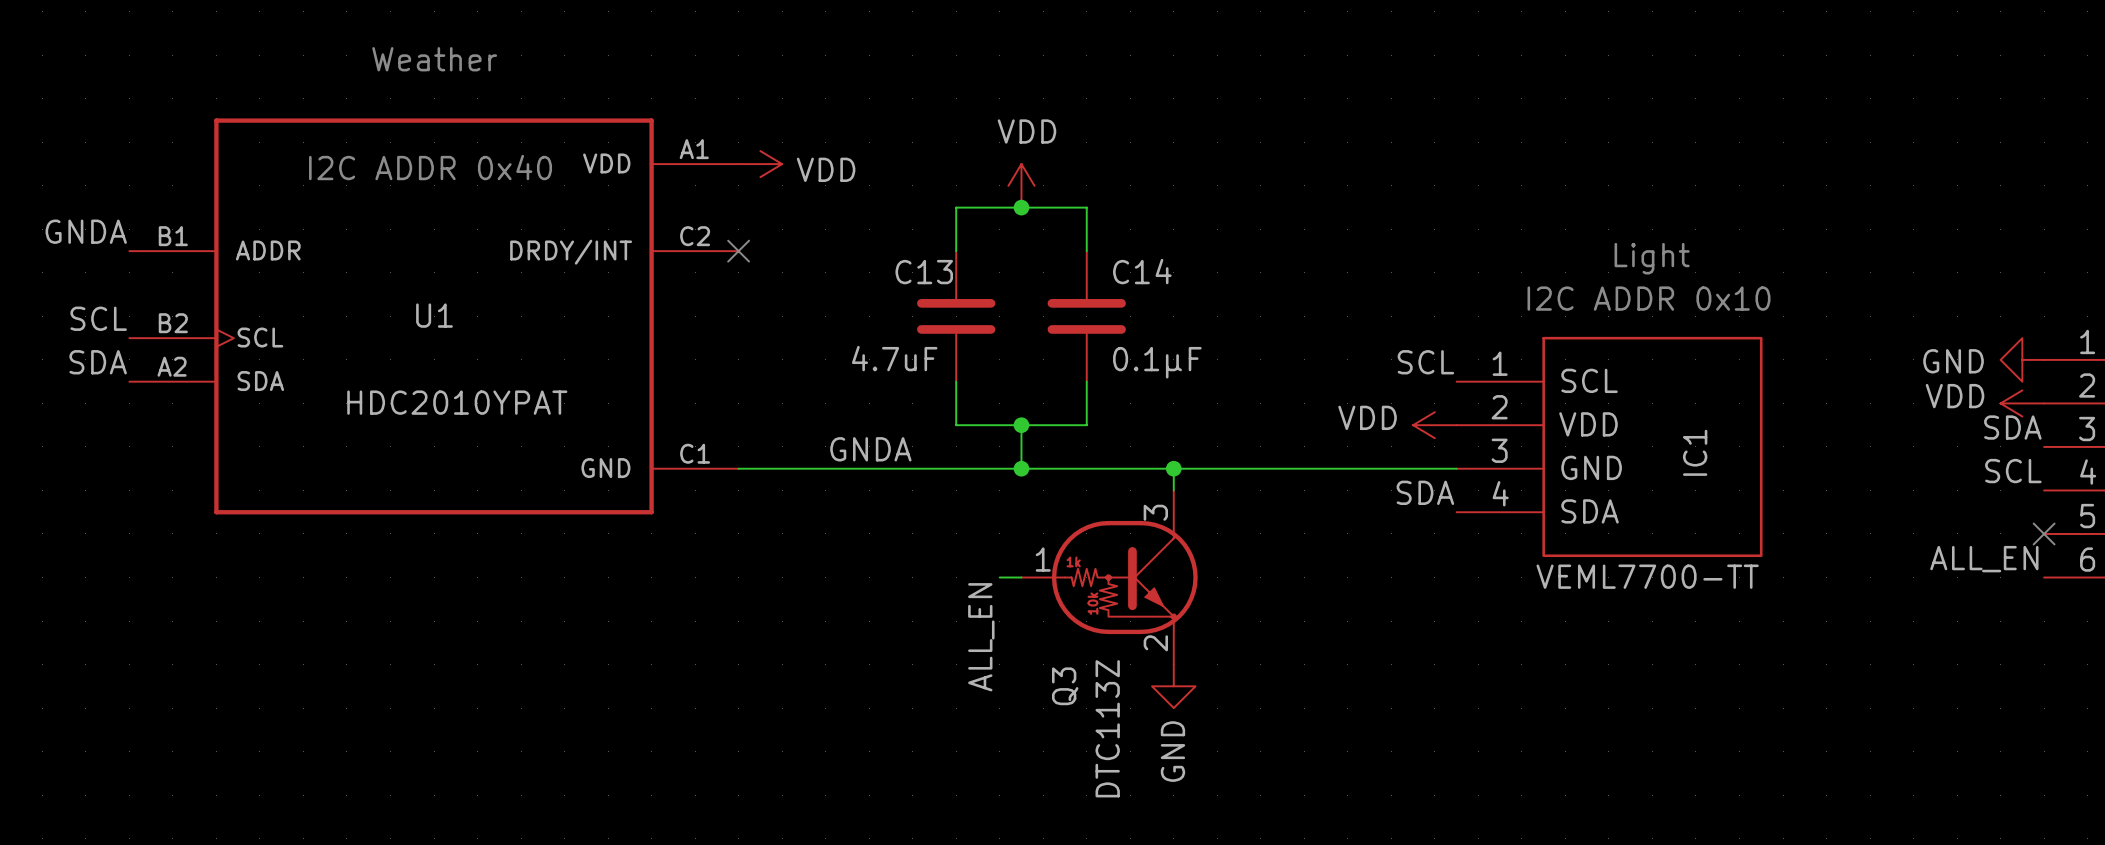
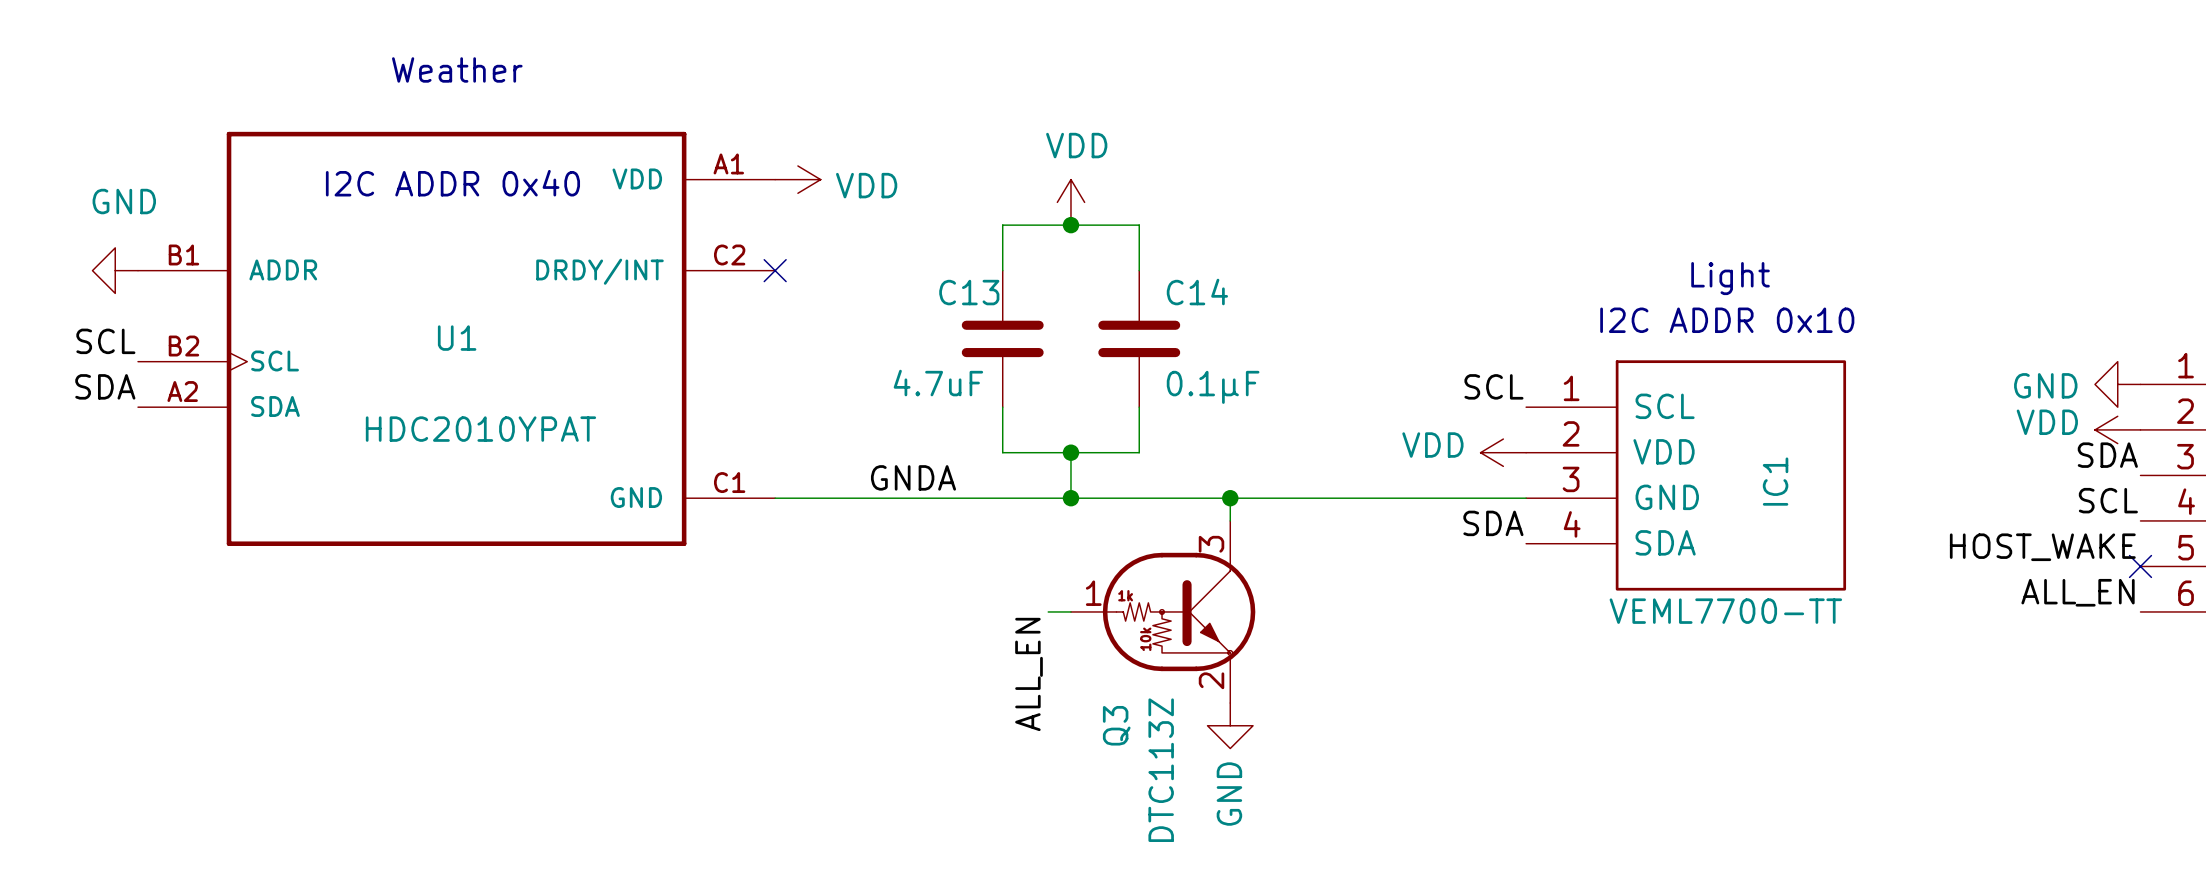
label: GNDA (86, 231) -> none
power symbol: none -> GND (115, 270)
label: none -> HOST_WAKE (2042, 547)

